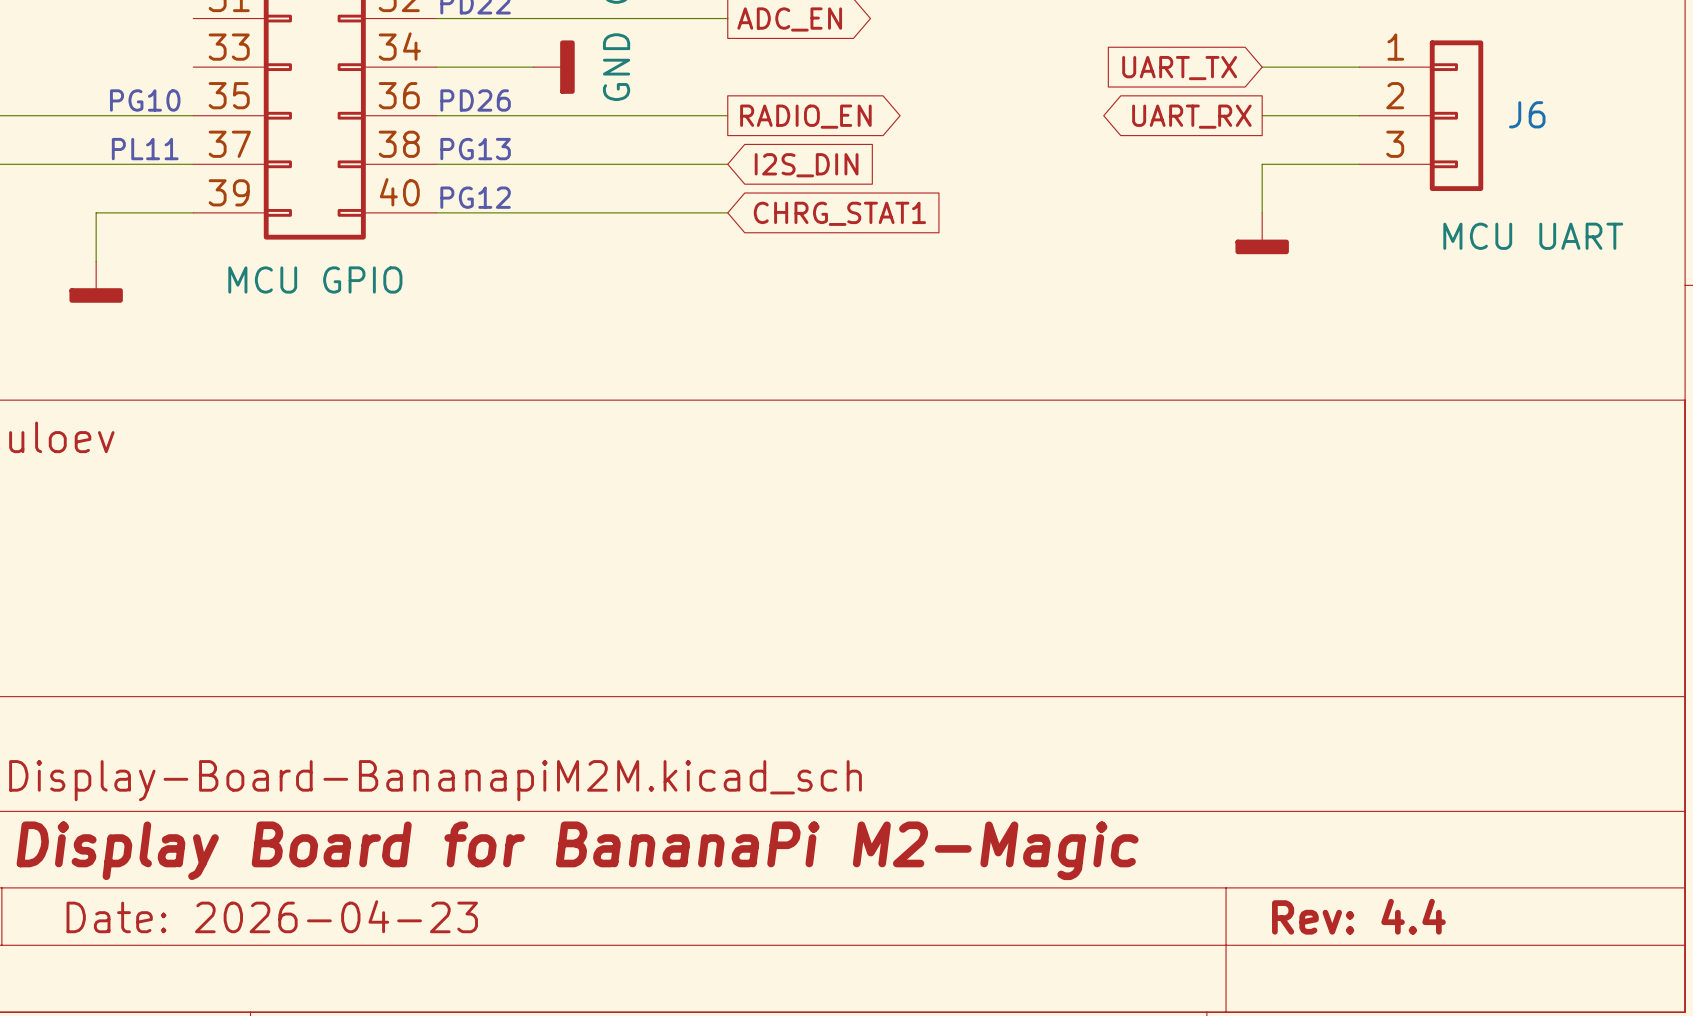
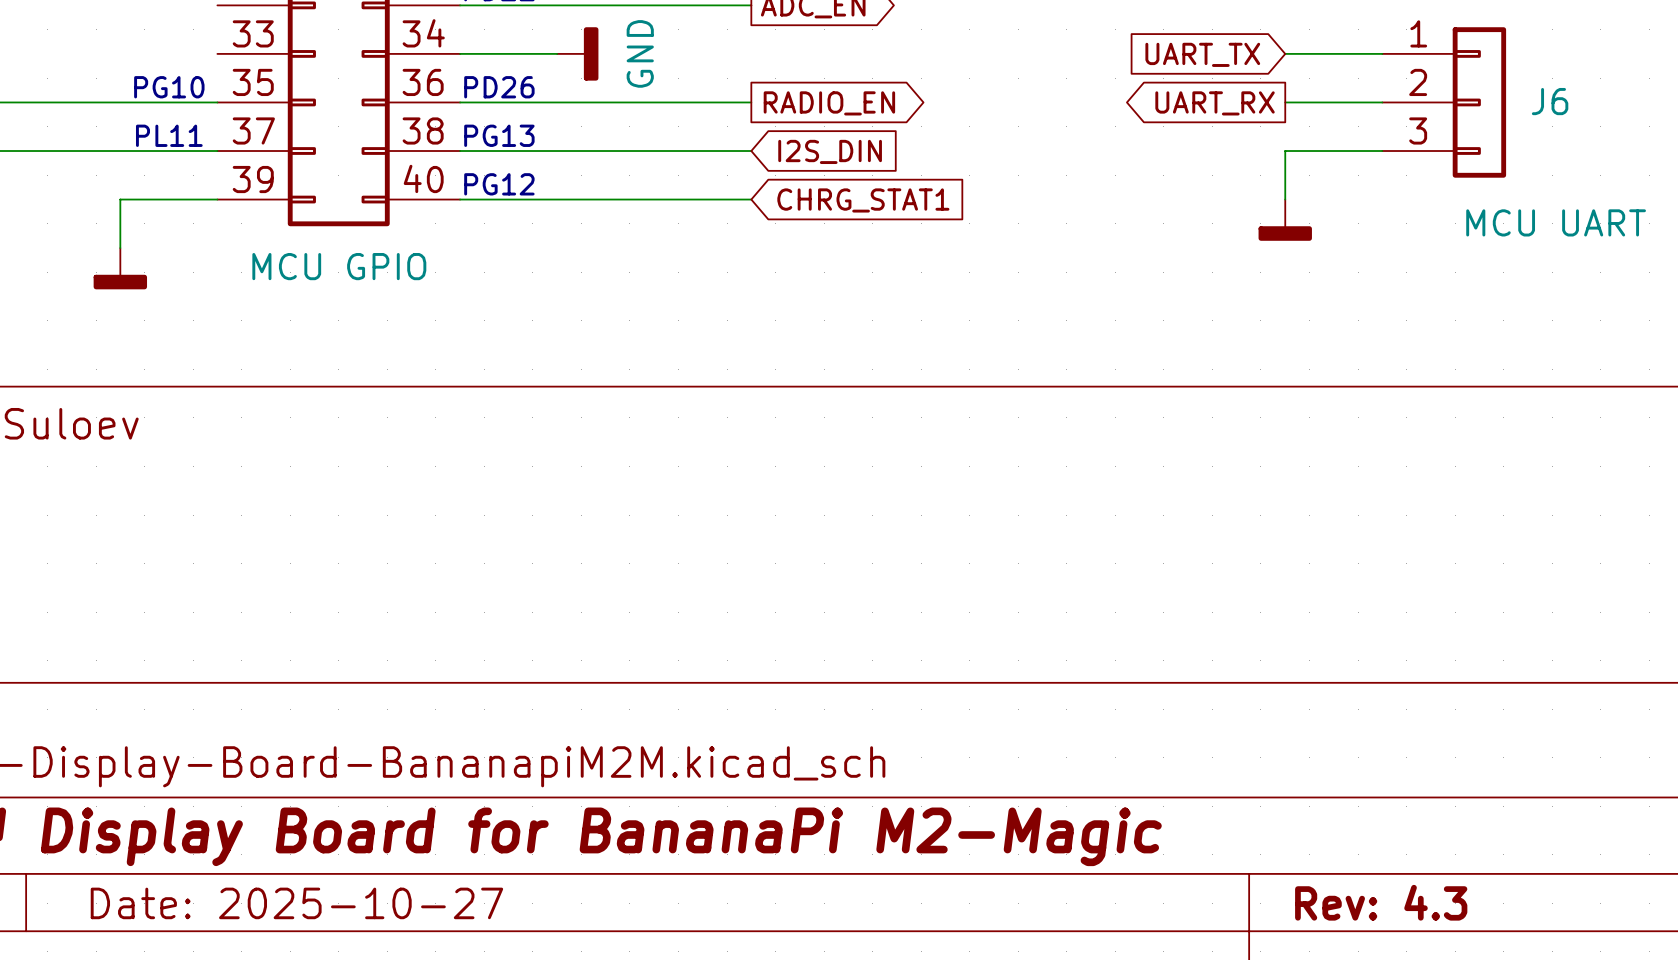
title block: Date: 2026-04-23 (272, 916) -> Date: 2025-10-27 (296, 903)
title block: Rev: 4.4 (1358, 916) -> Rev: 4.3 (1381, 902)

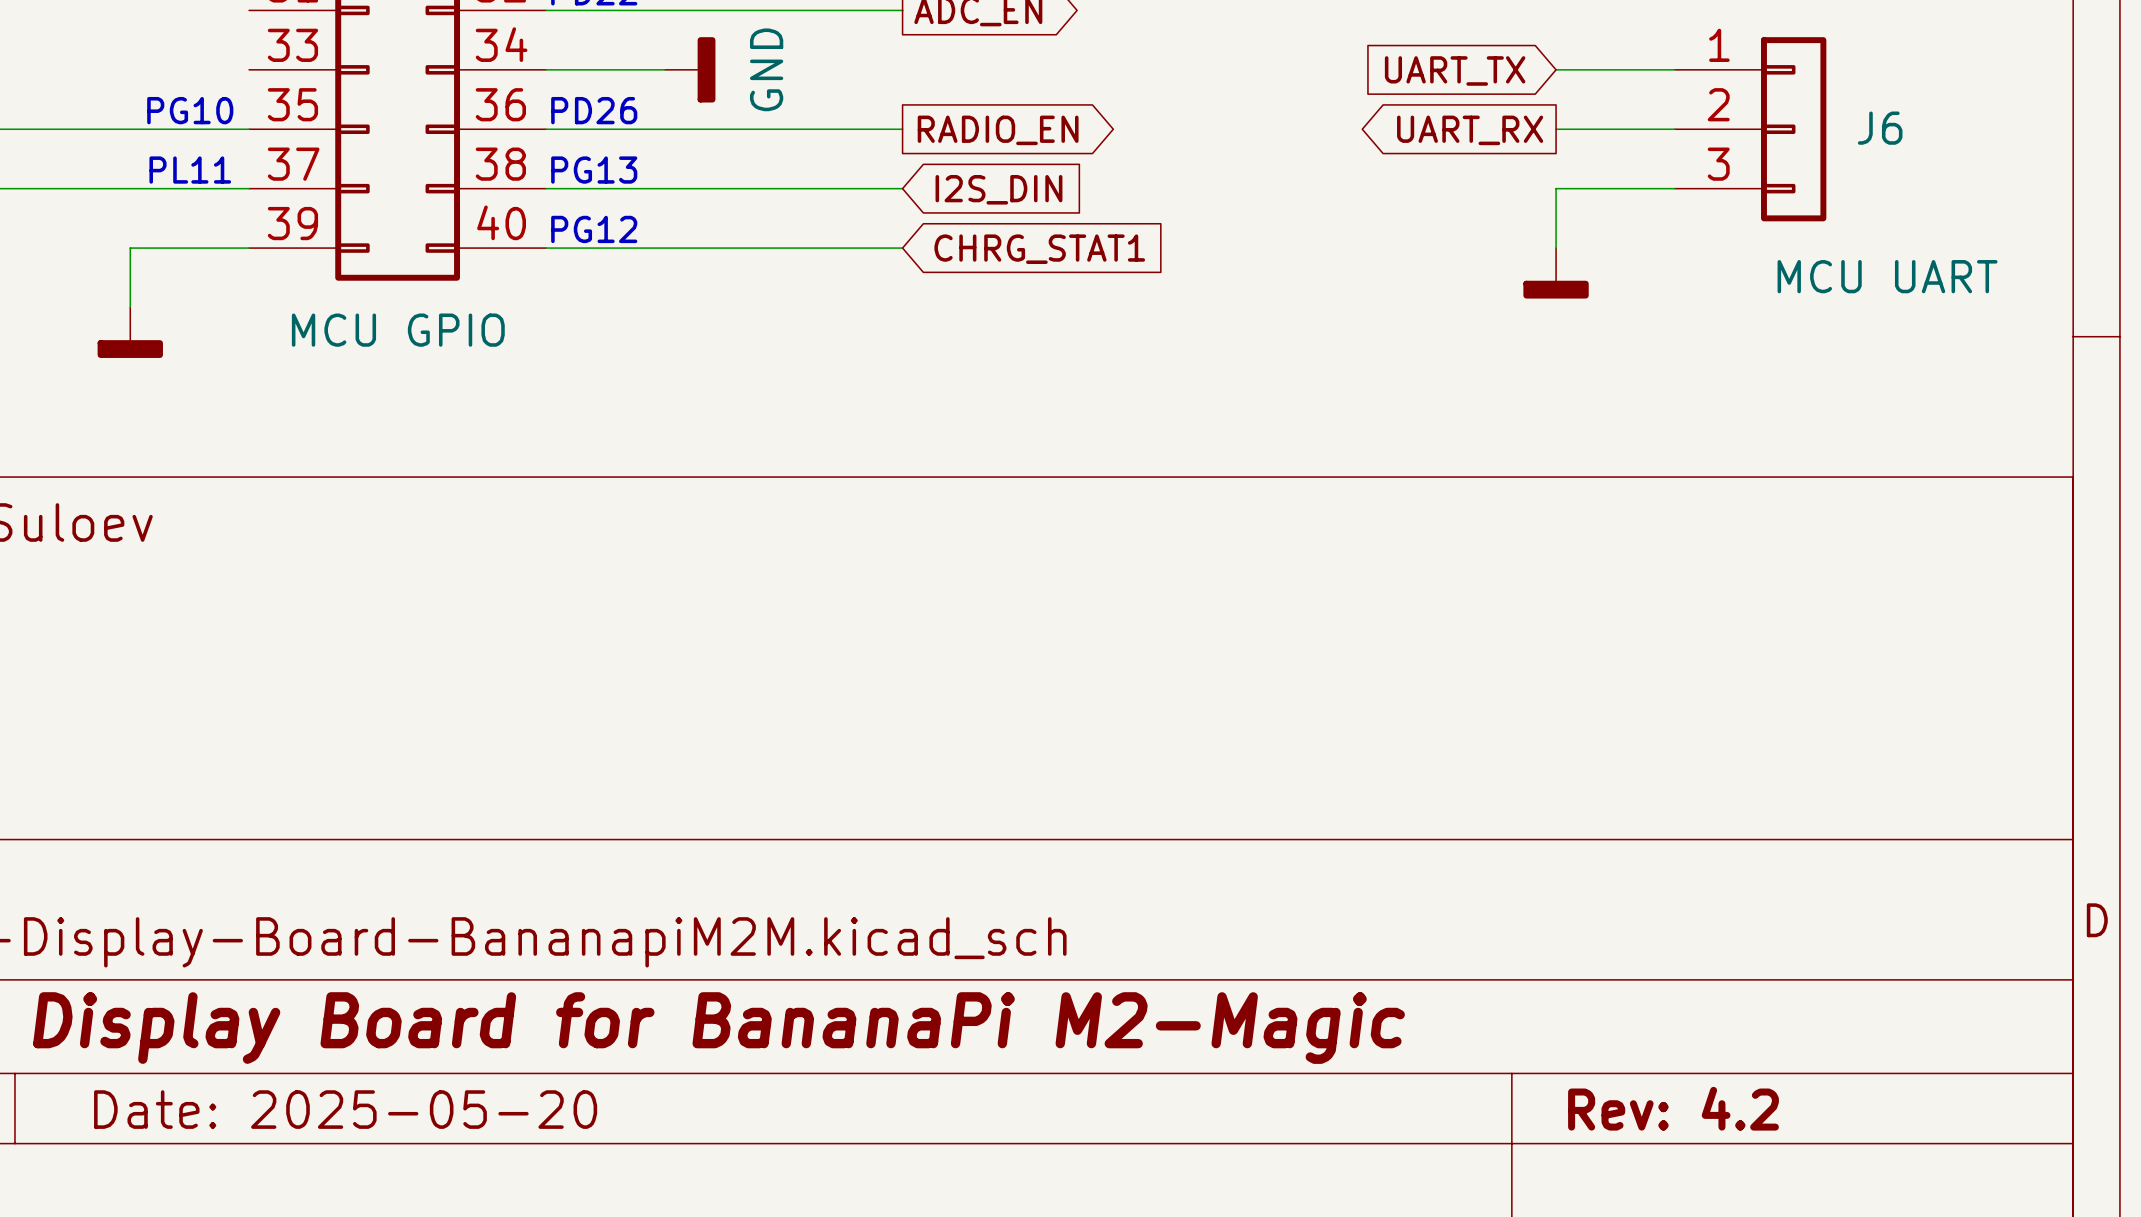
title block: Rev: 4.3 (1381, 902) -> Rev: 4.2 (1673, 1108)
title block: Date: 2025-10-27 (296, 903) -> Date: 2025-05-20 (345, 1109)

